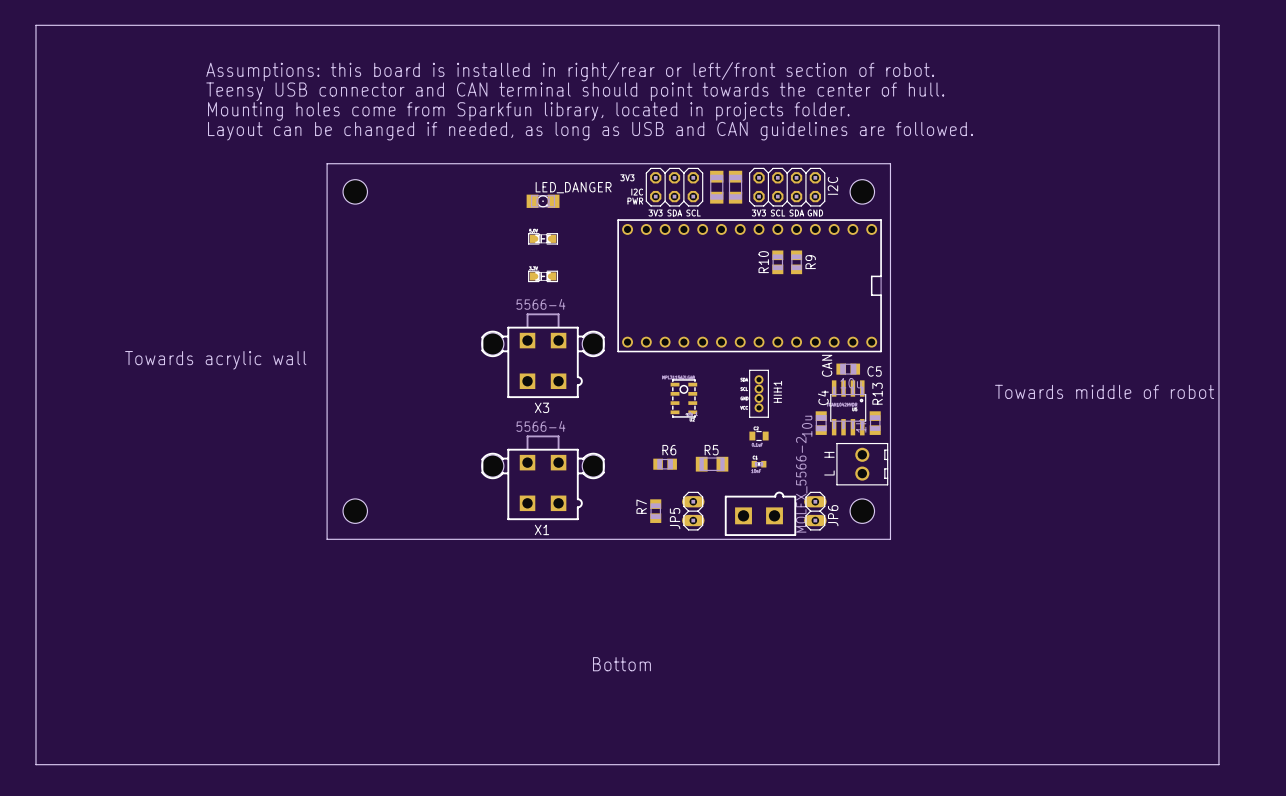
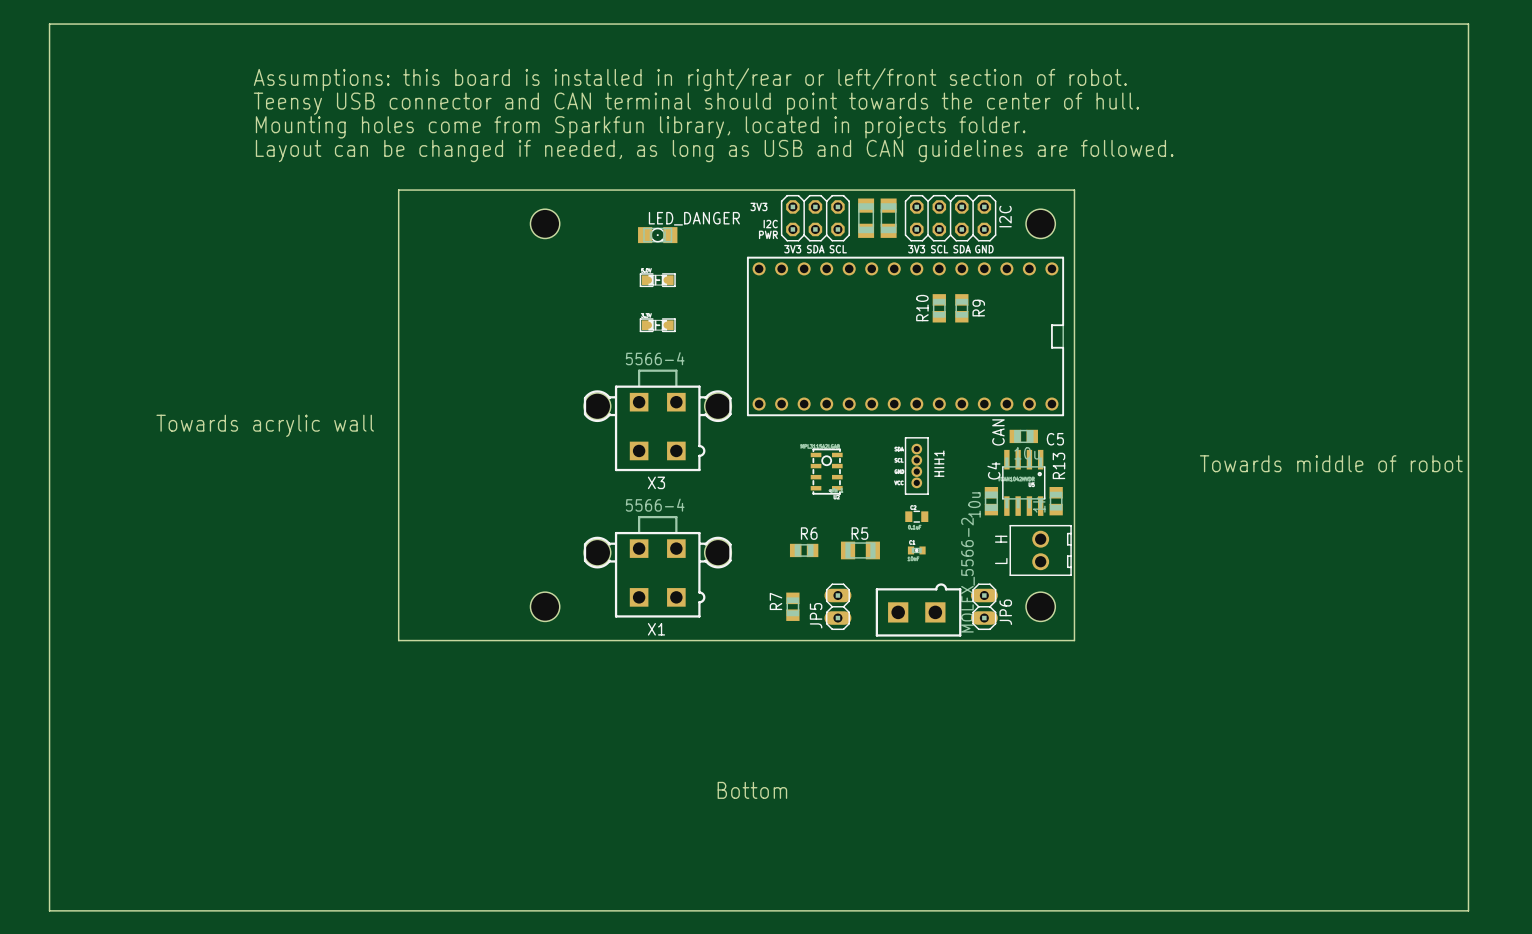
part position: (355, 191) -> (545, 223)
part position: (355, 511) -> (545, 606)

